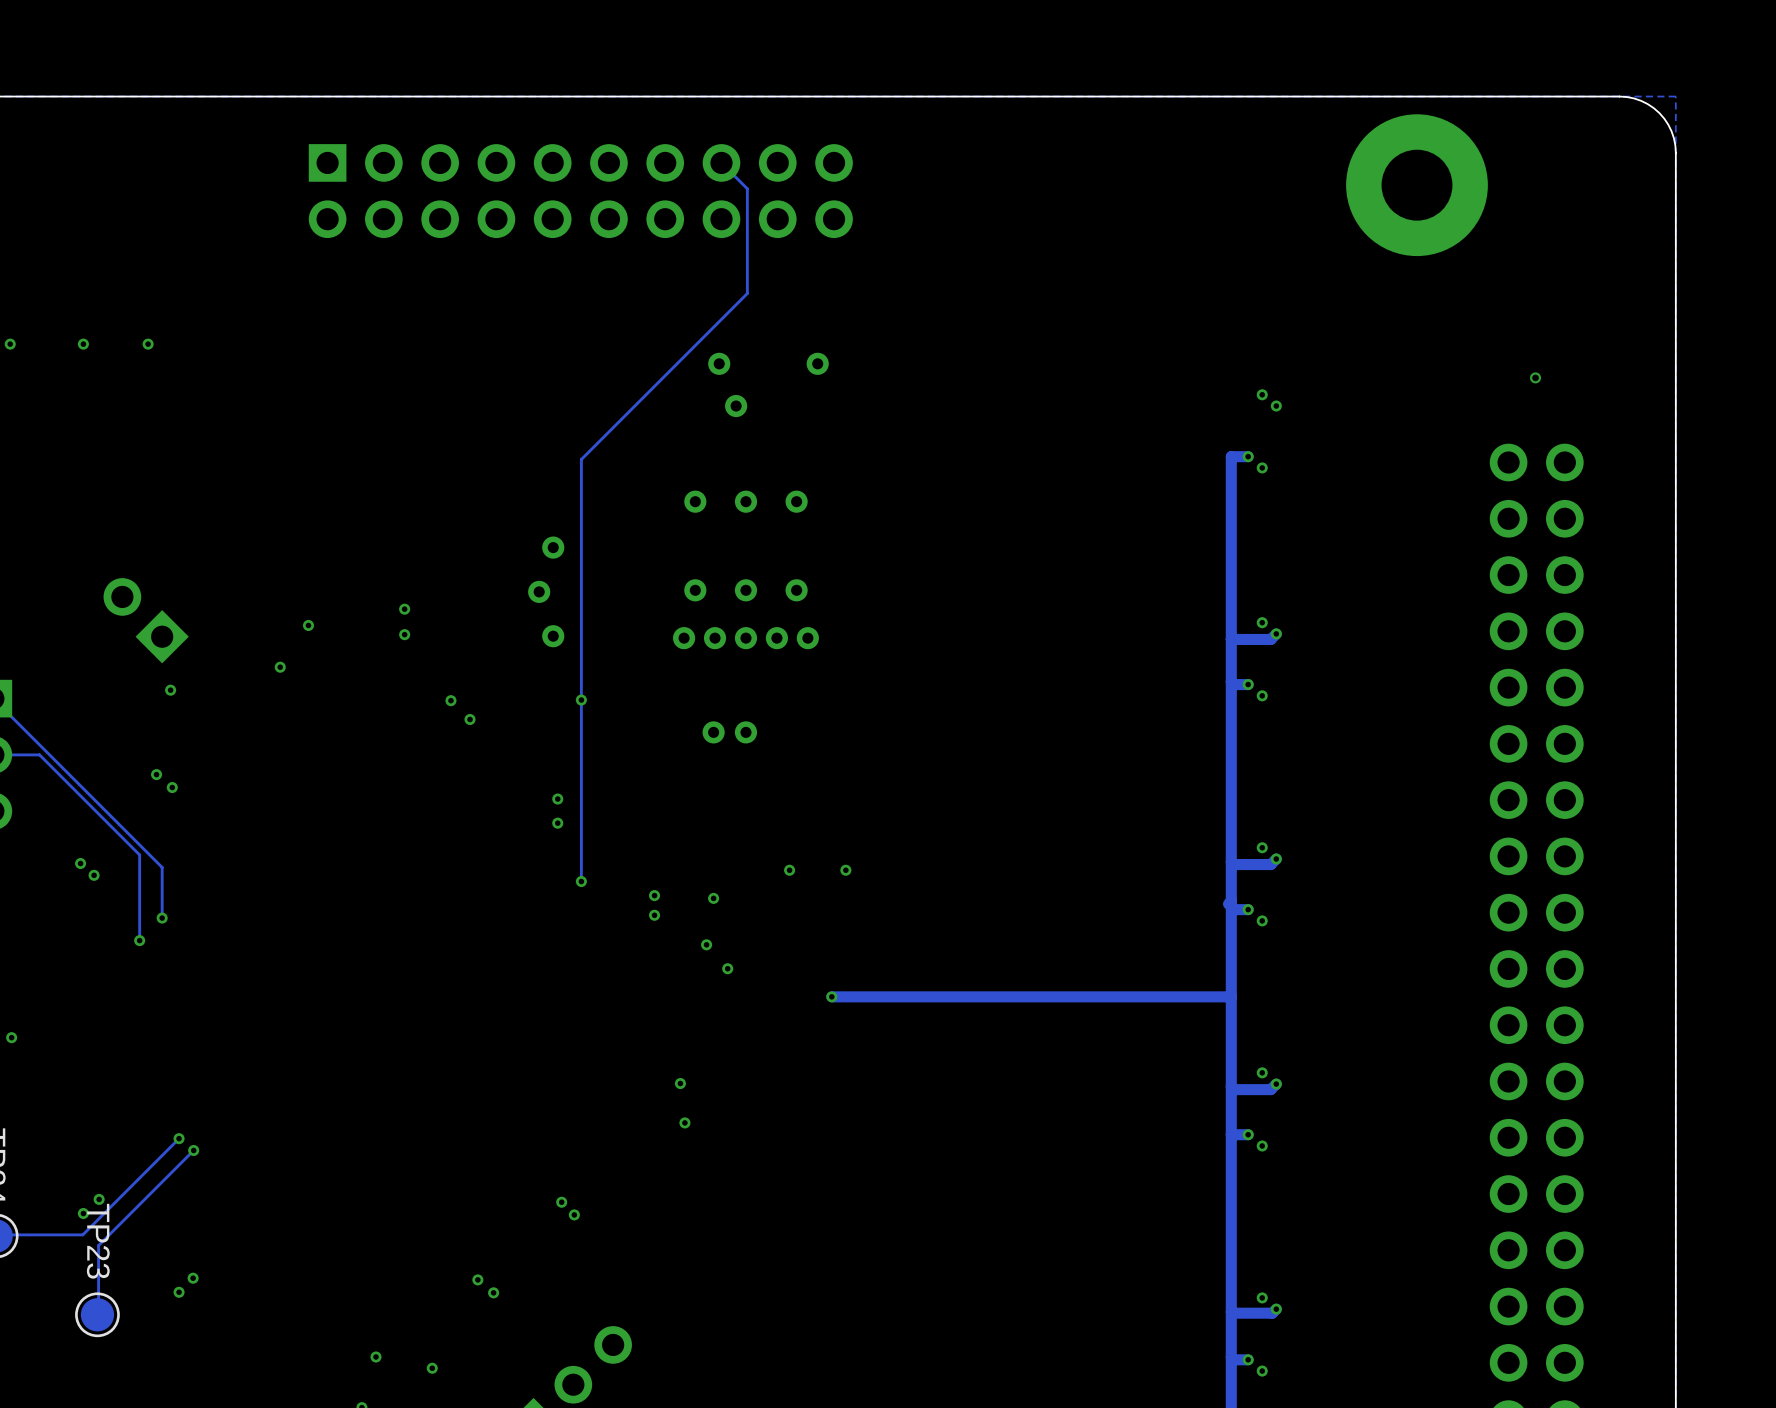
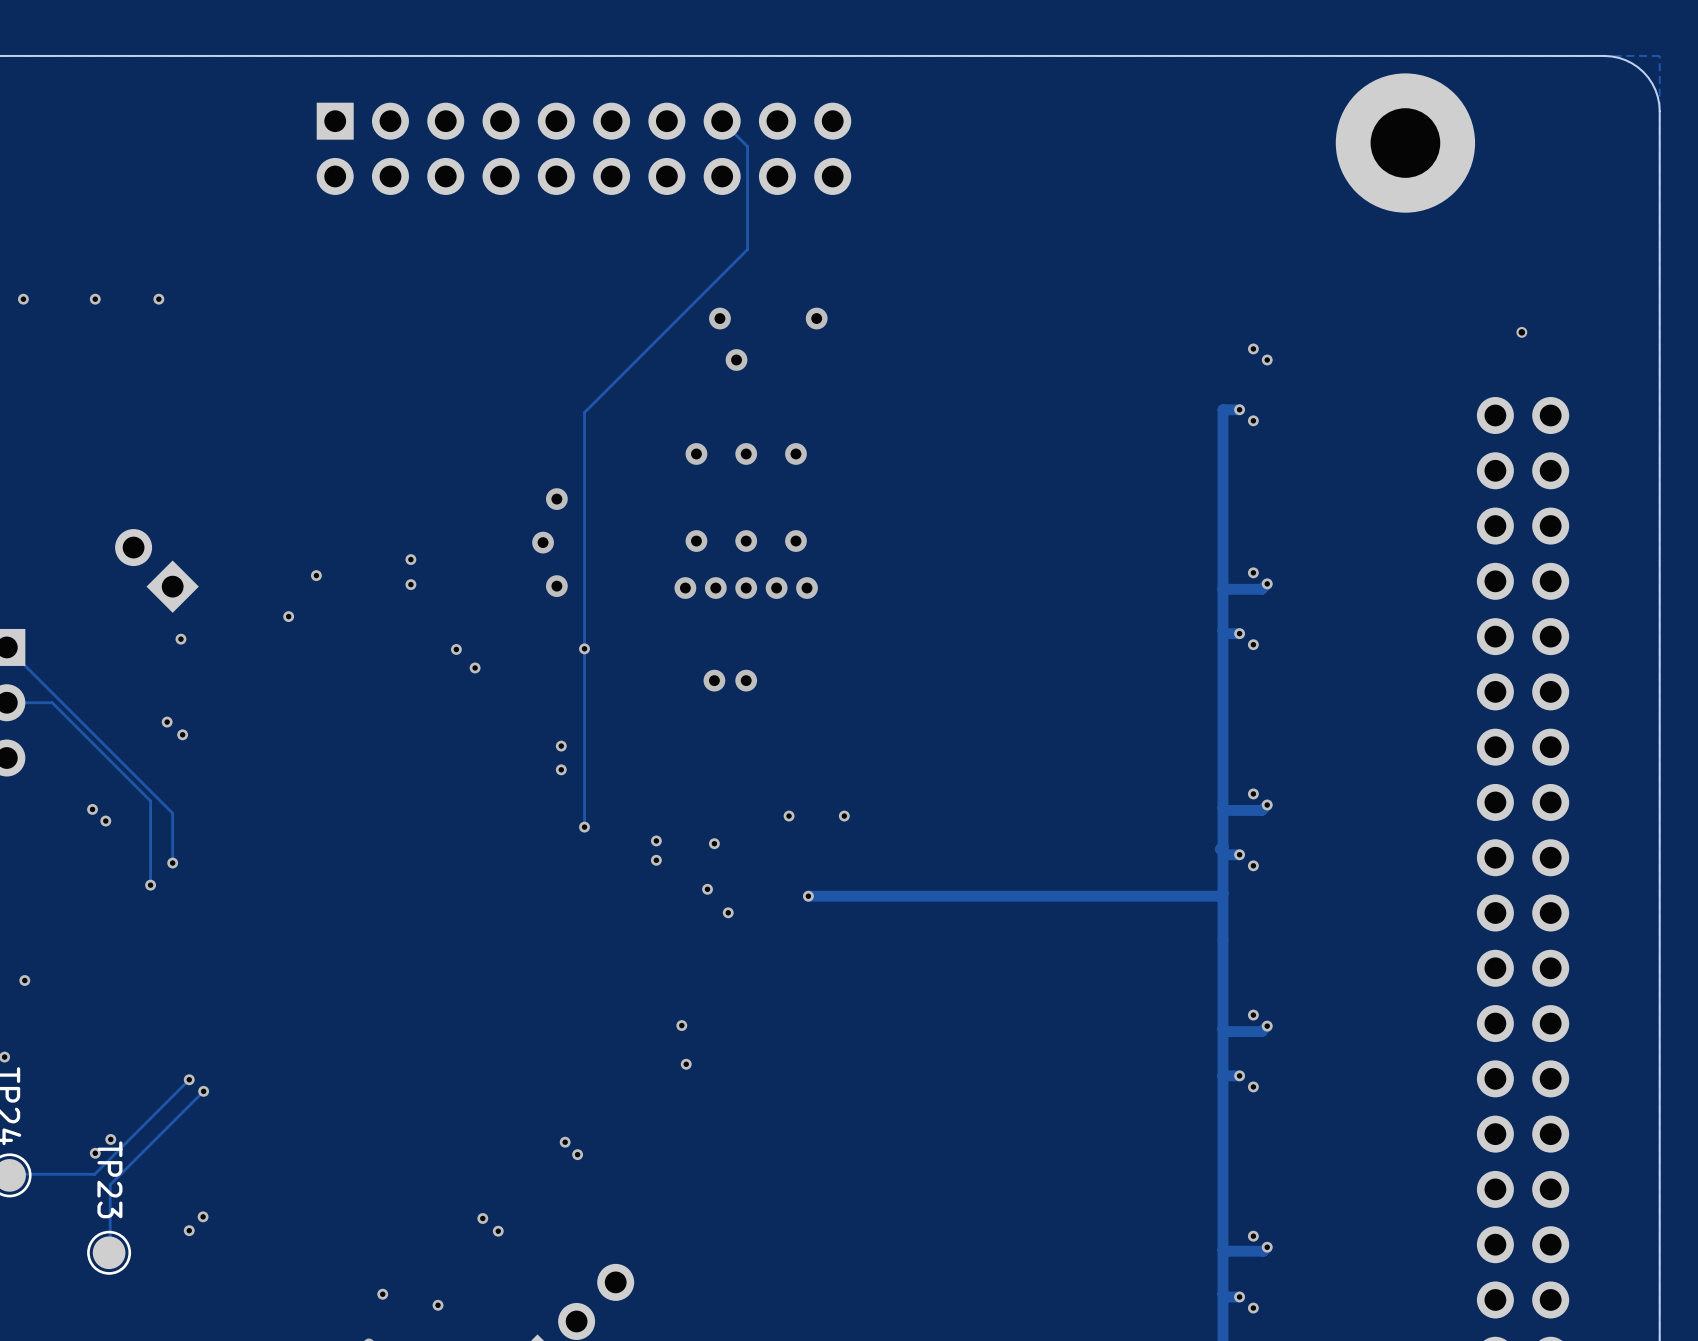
track: none -> (1223, 893) (1220, 896) (808, 896)
via position: (831, 996) -> (808, 896)
track: (1231, 996) (831, 996) -> none

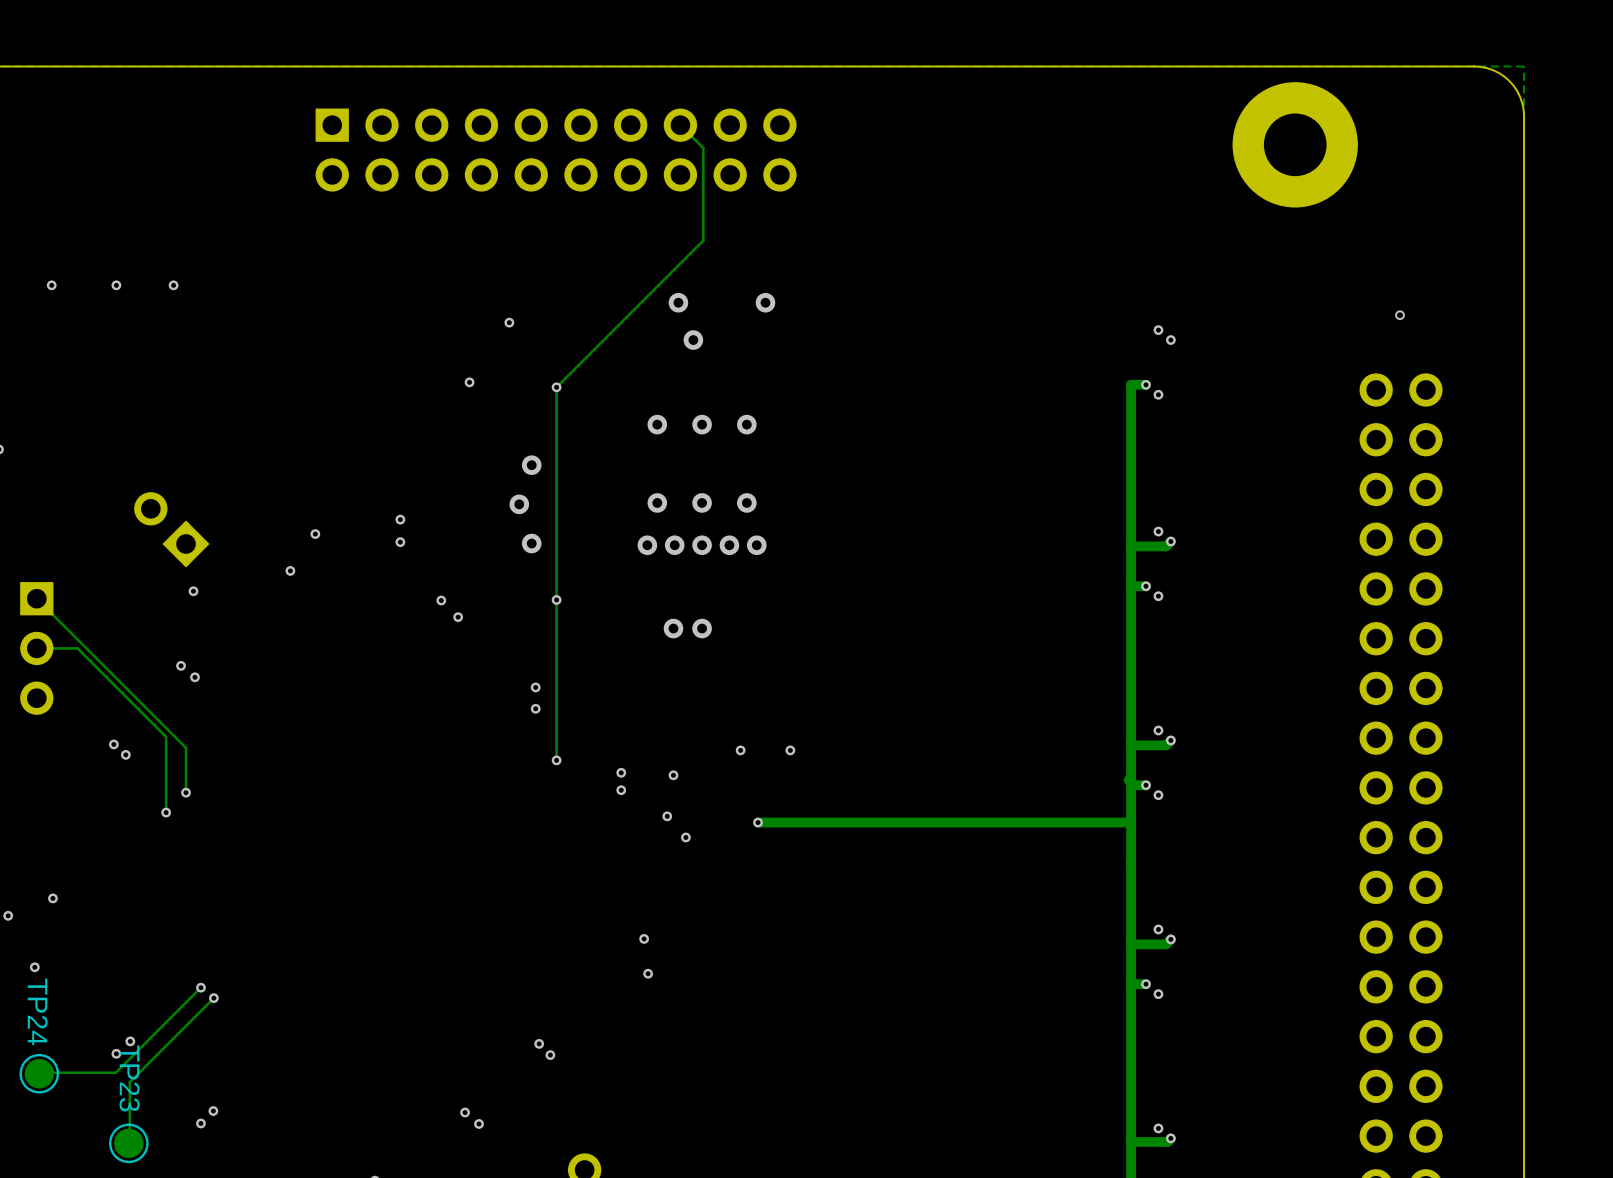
via: none -> (509, 322)
via: none -> (469, 382)
via: none -> (556, 387)

